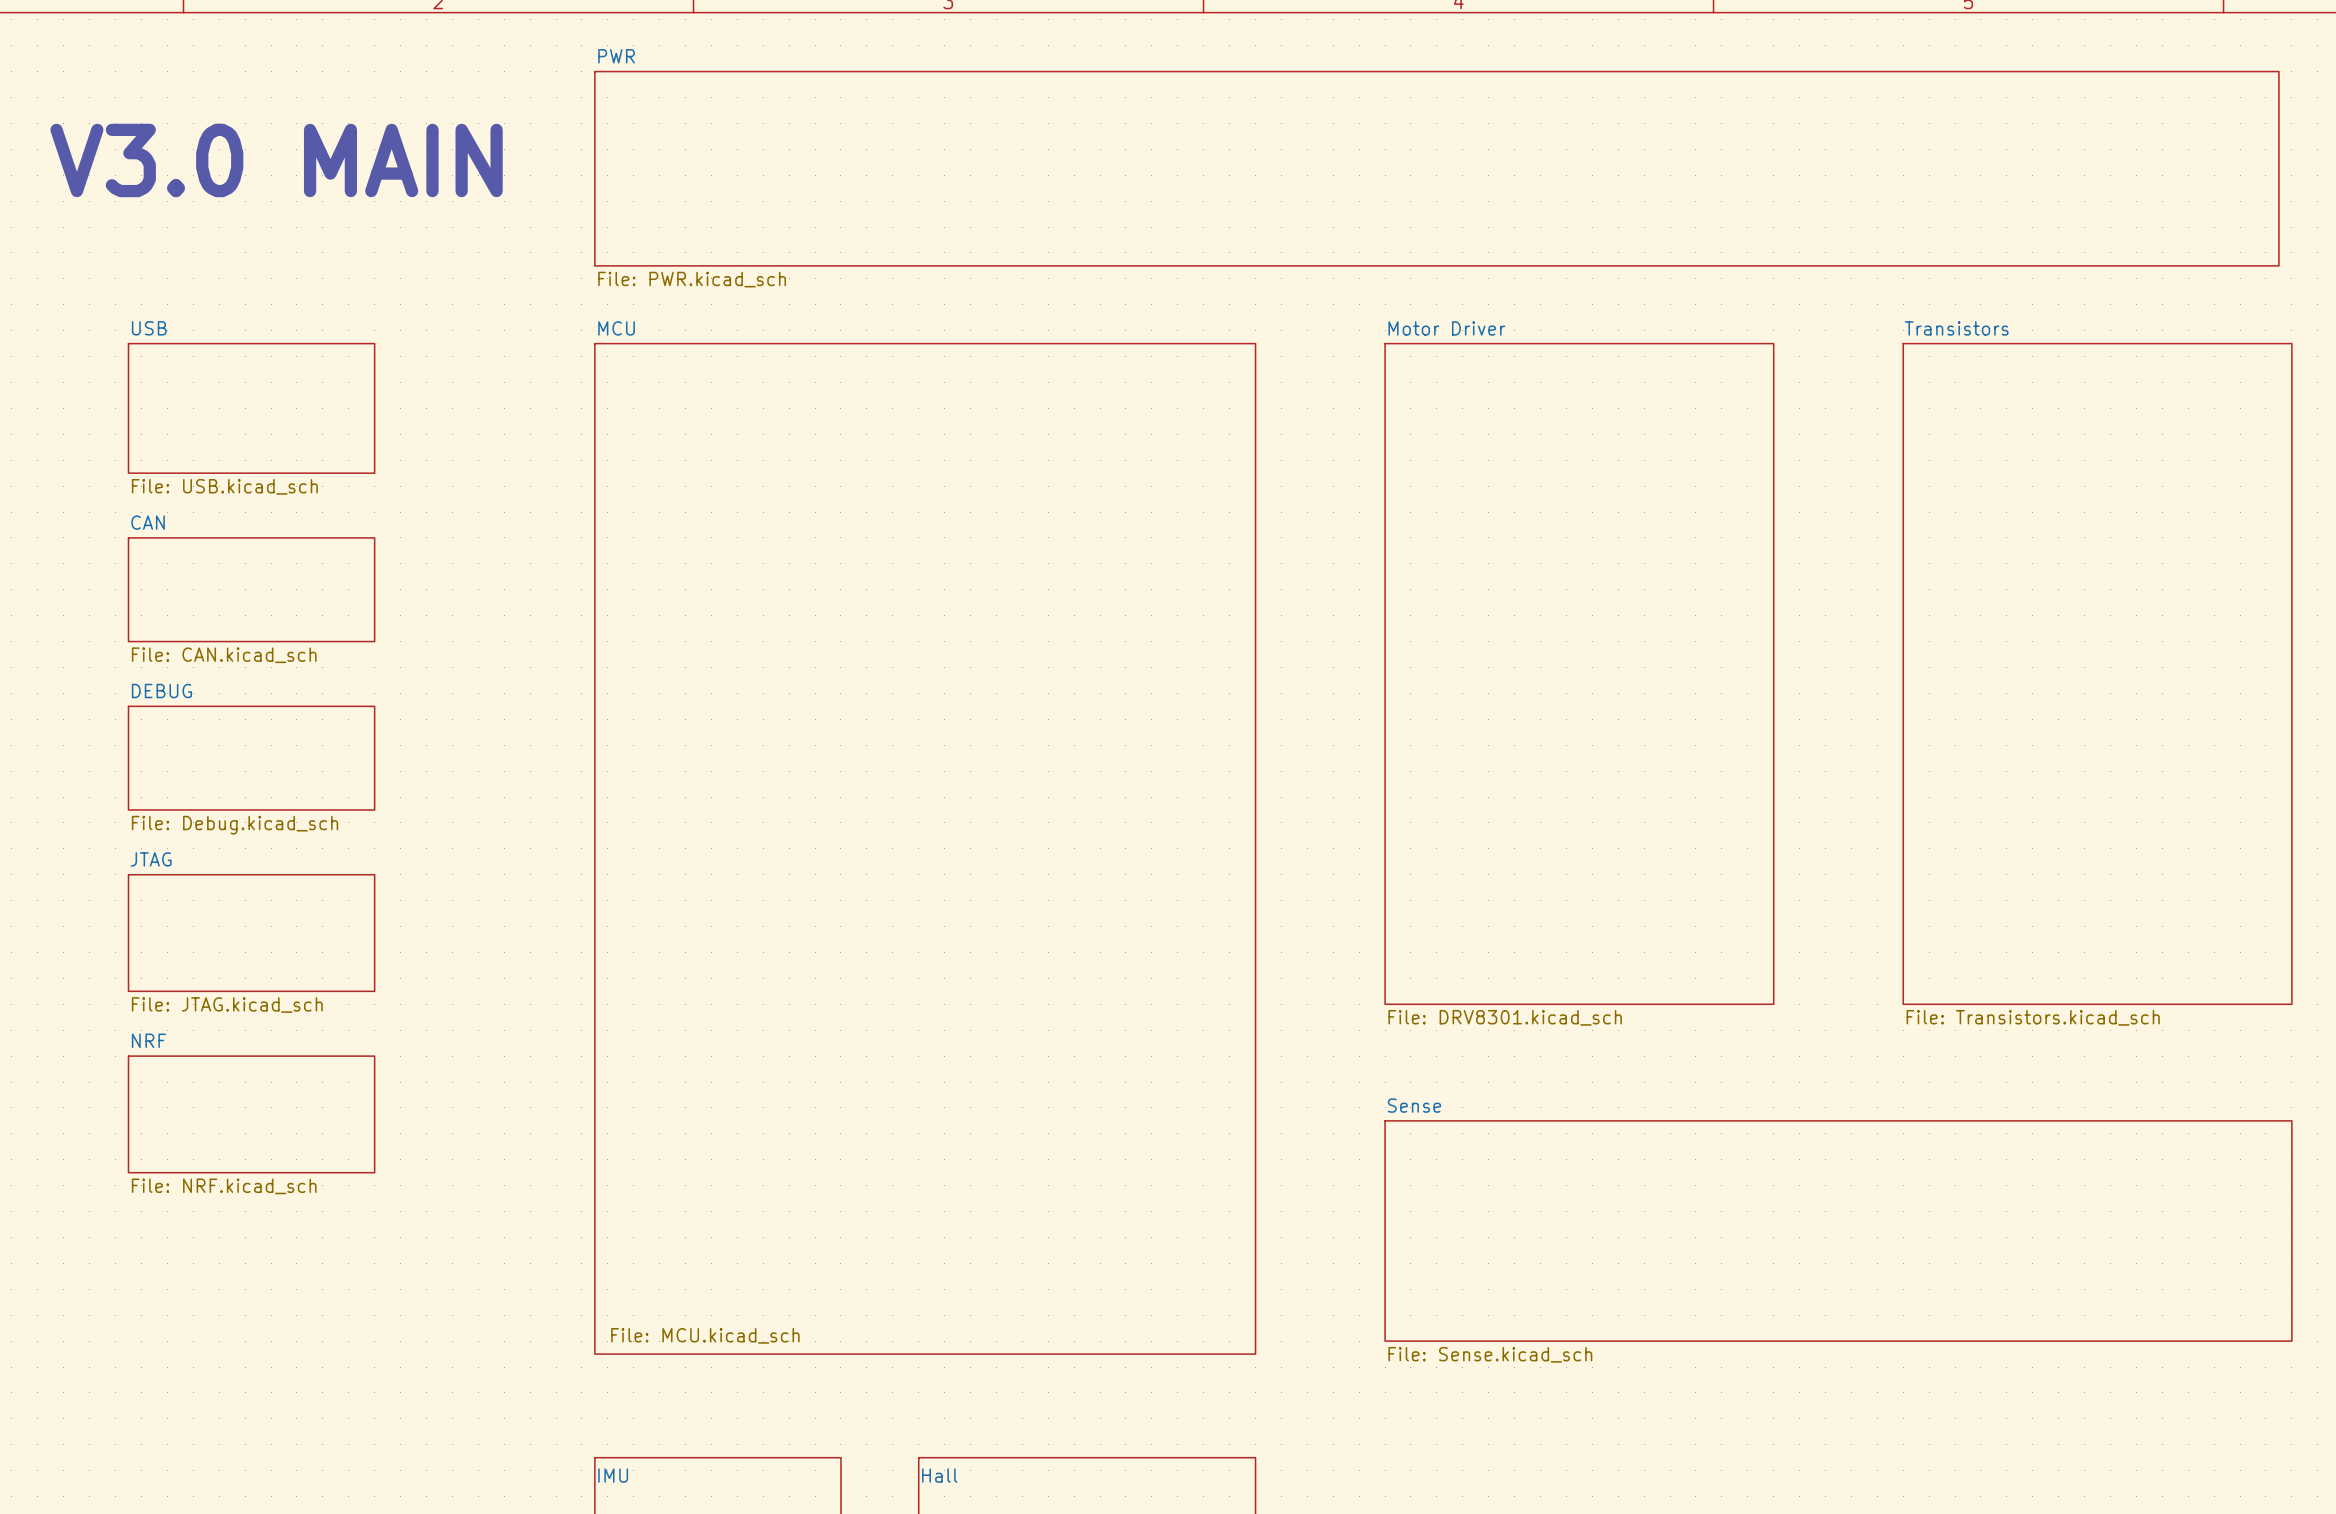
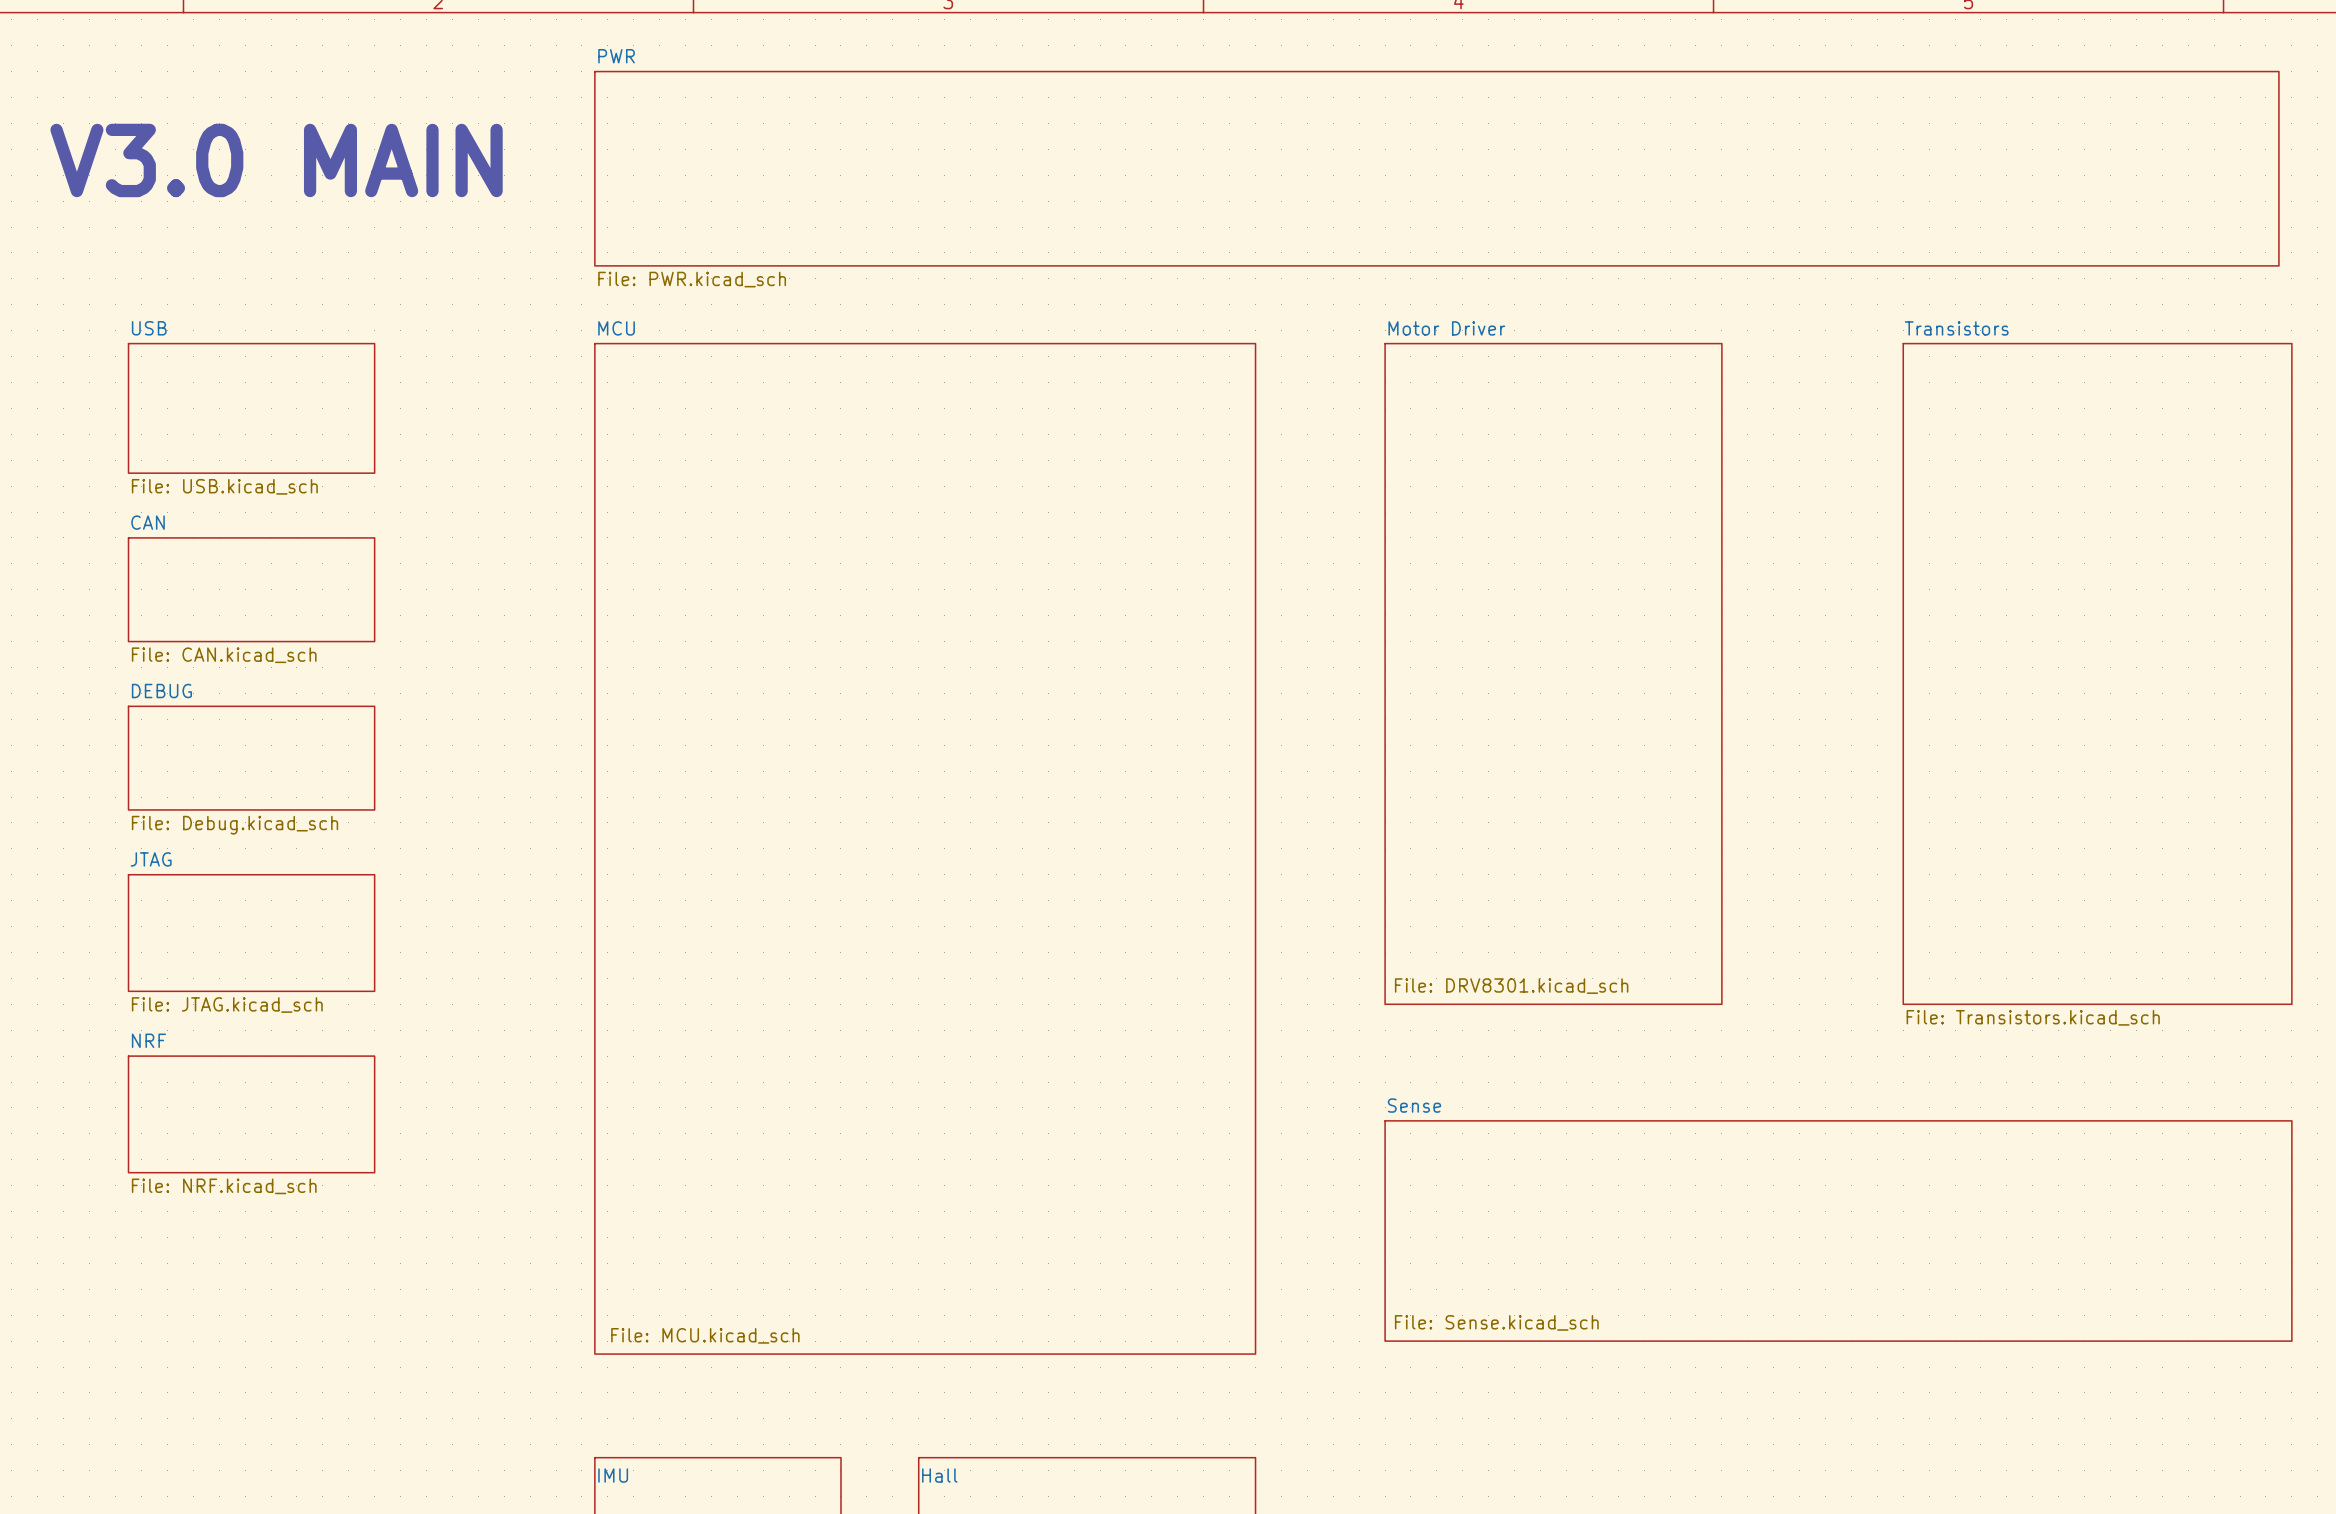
sheet Motor Driver: none -> File: DRV8301.kicad_sch (1553, 673)
sheet Motor Driver: File: DRV8301.kicad_sch (1579, 673) -> none
sheet Sense value position: File: Sense.kicad_sch (1490, 1354) -> File: Sense.kicad_sch (1496, 1322)

